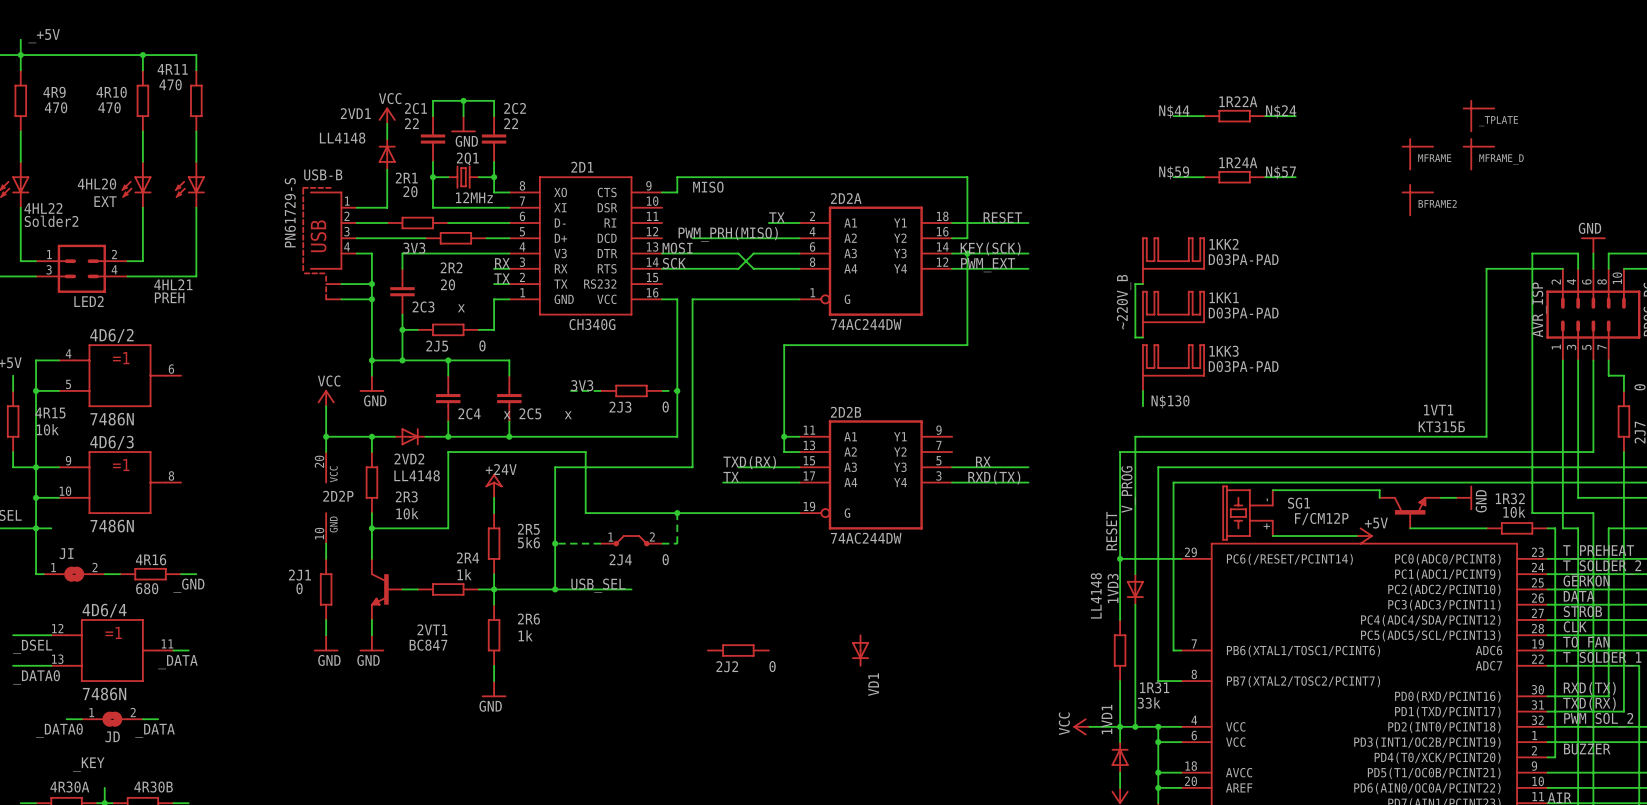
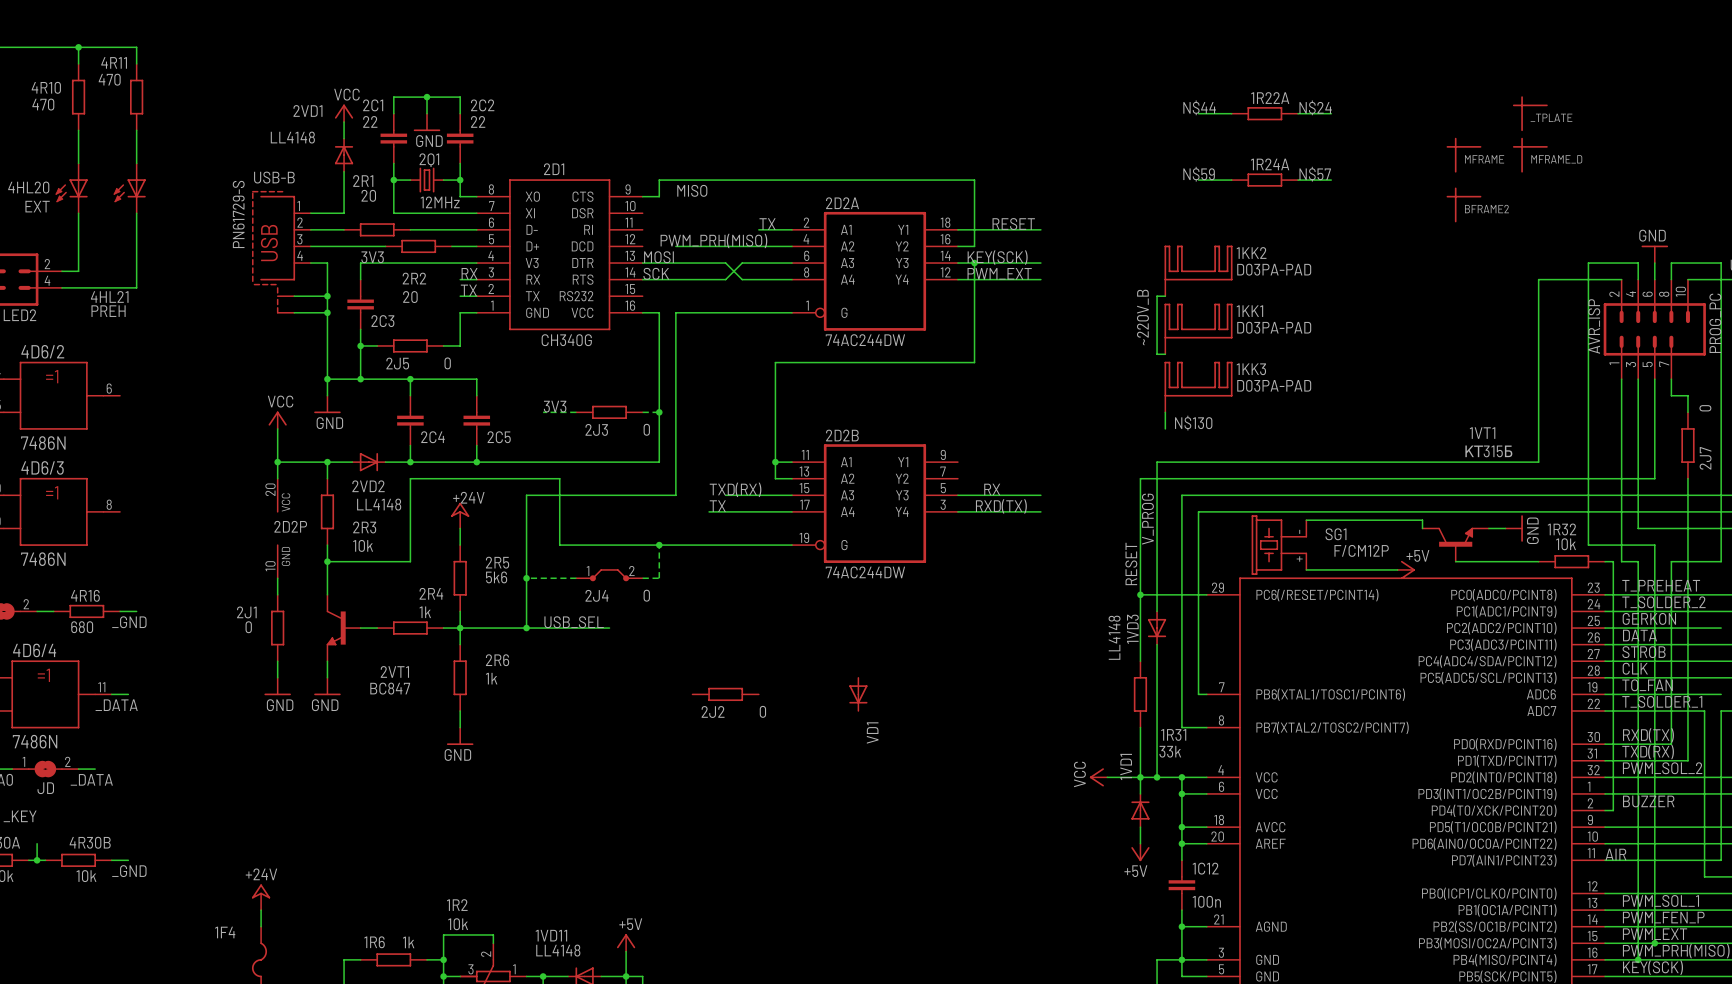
2C3 value: x (461, 308) -> none
2C4 value: x (507, 415) -> none
2C5 value: x (568, 415) -> none

